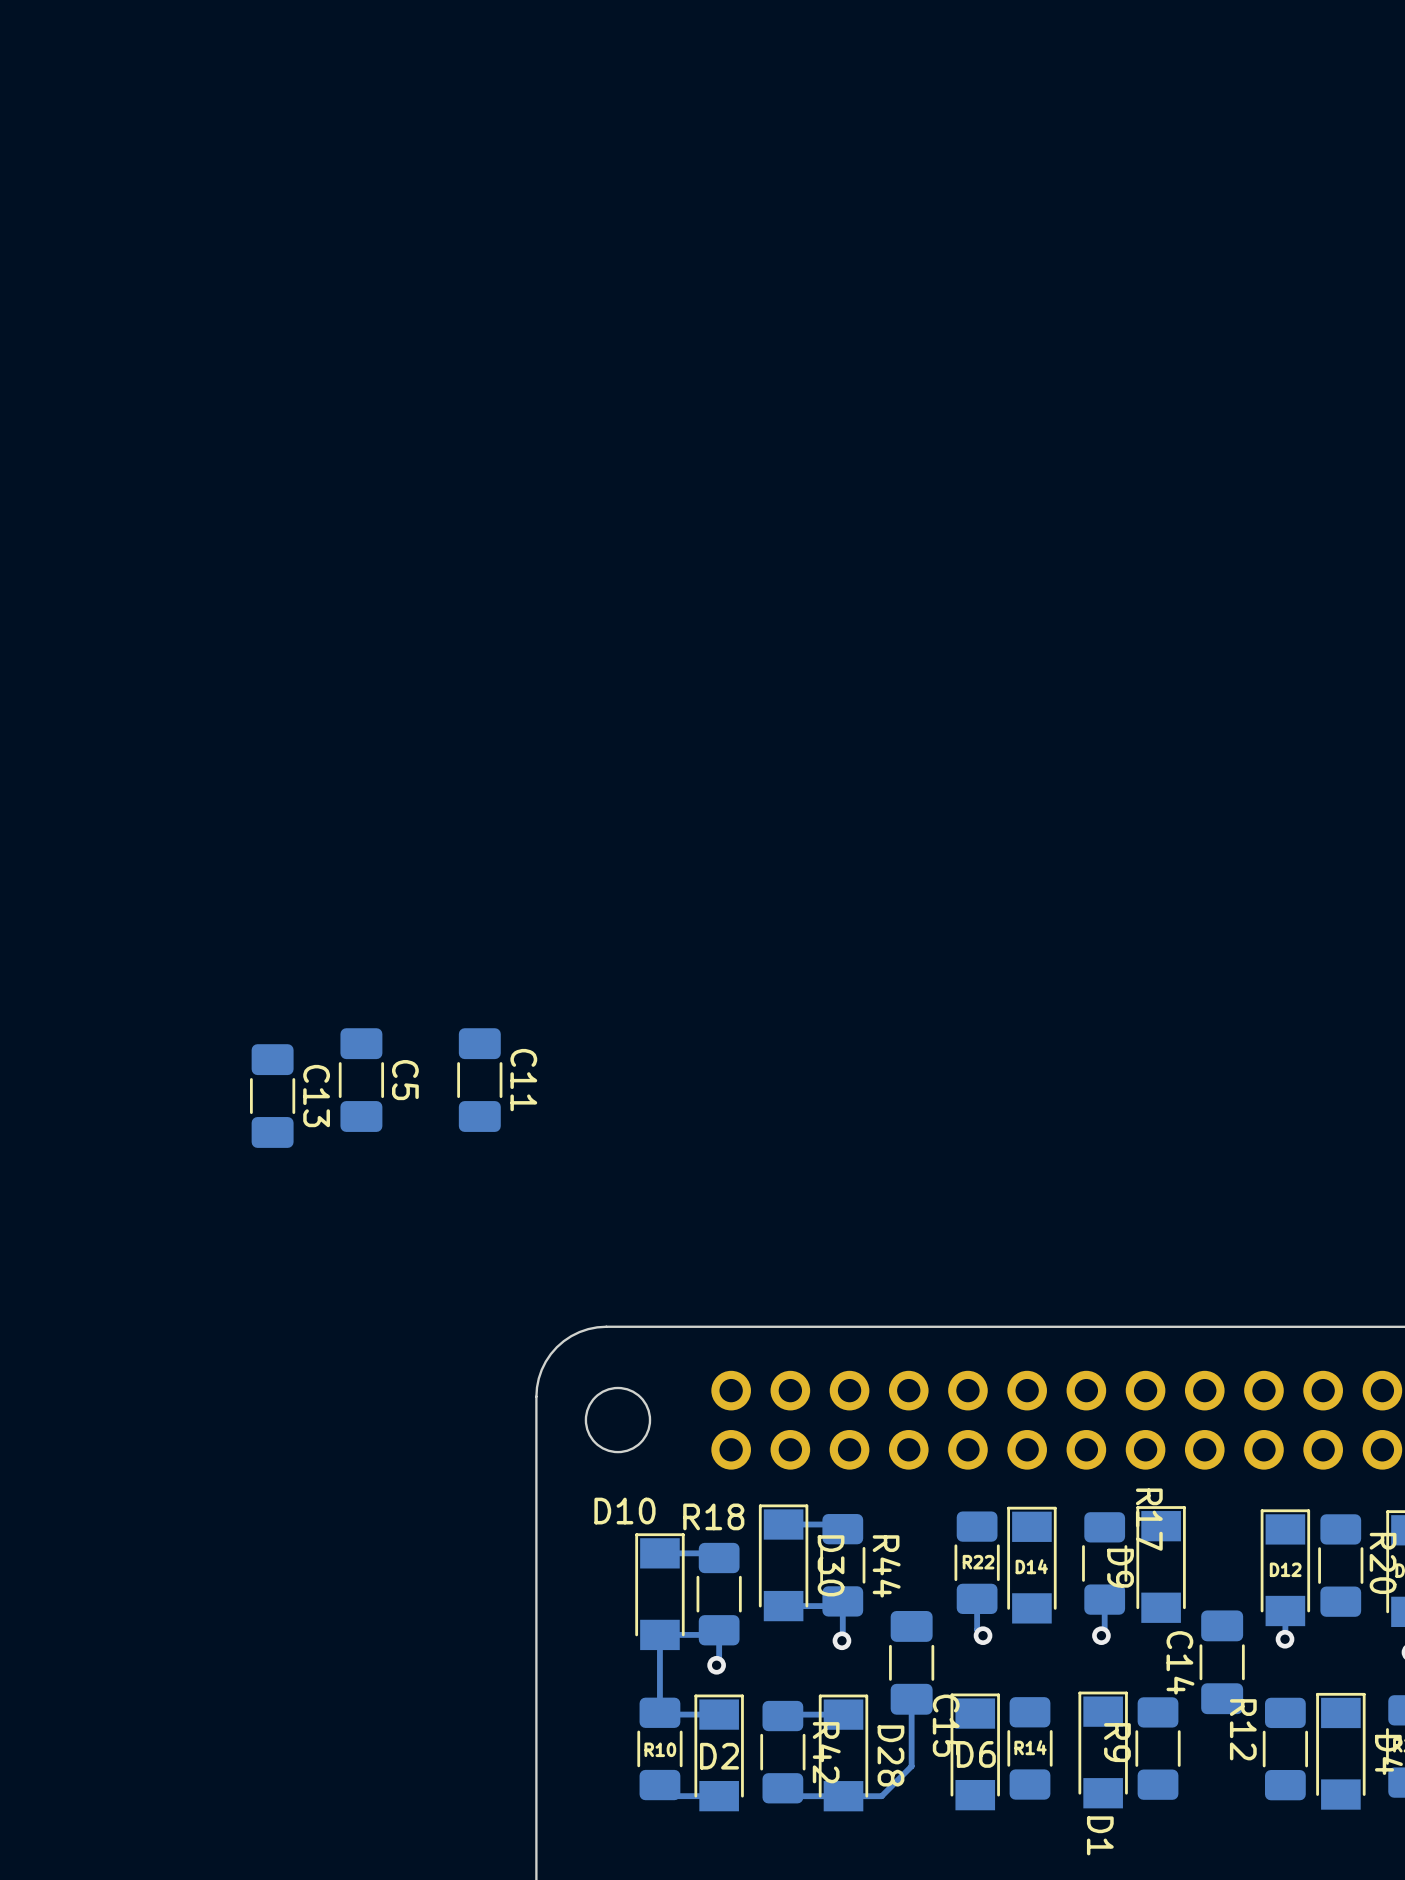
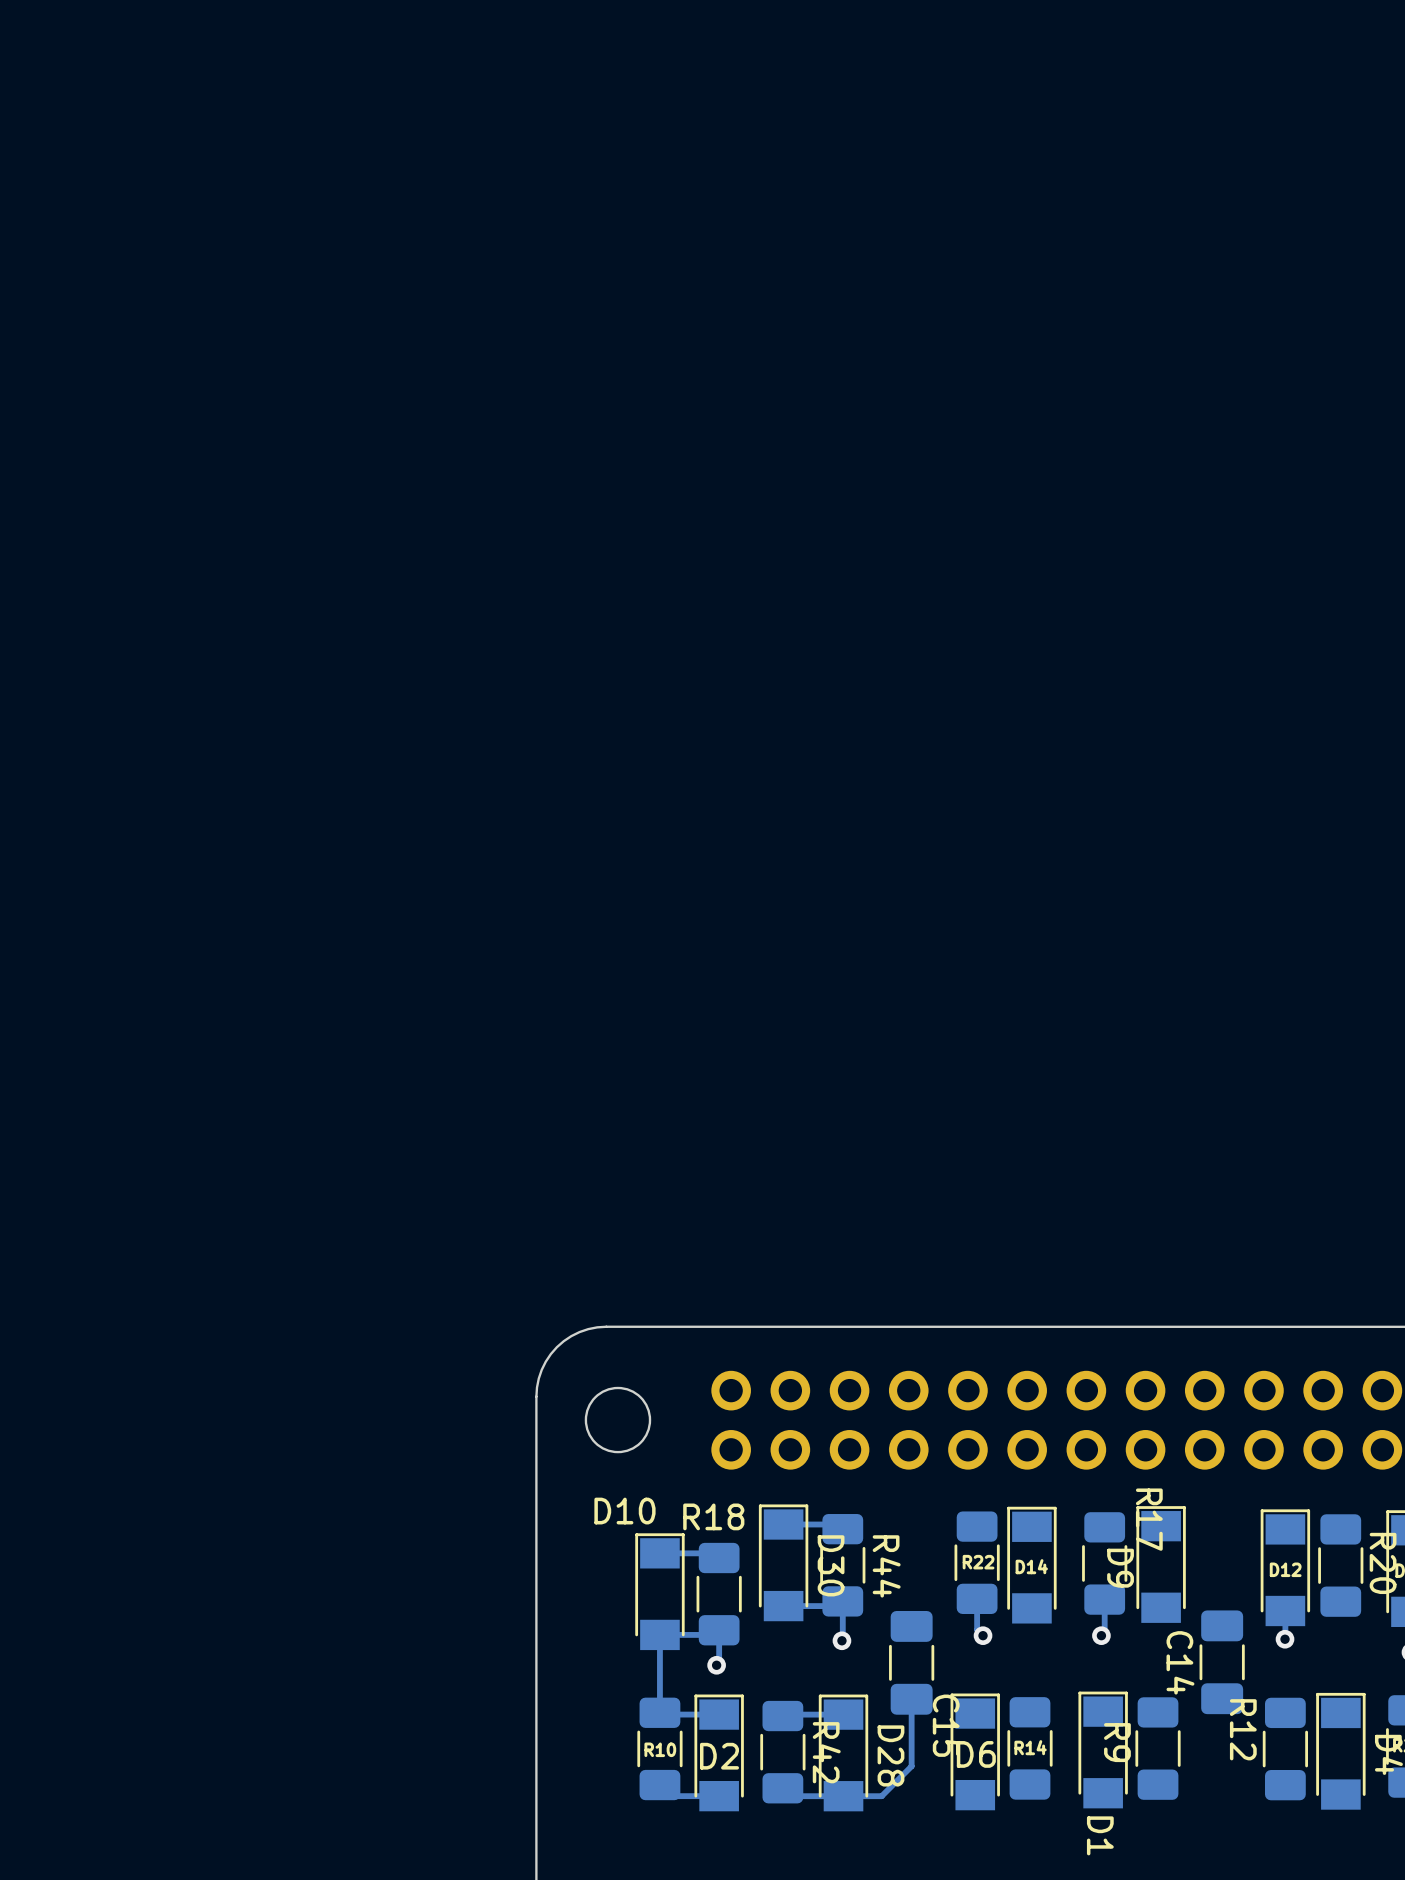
C5: (361, 1080) -> none
C11: (479, 1080) -> none
C13: (272, 1096) -> none

